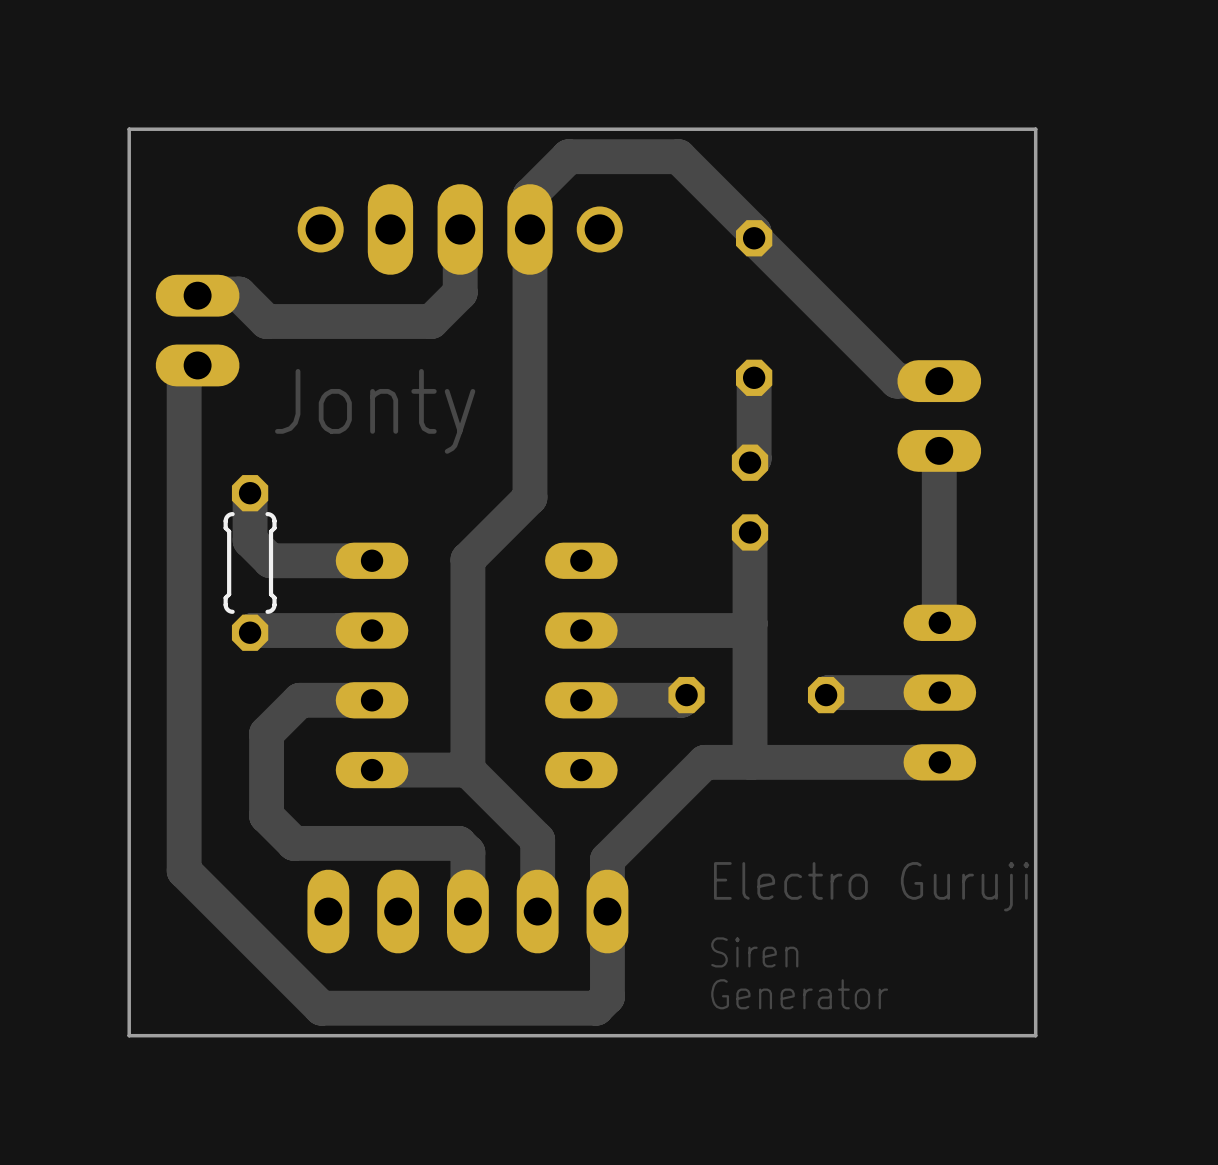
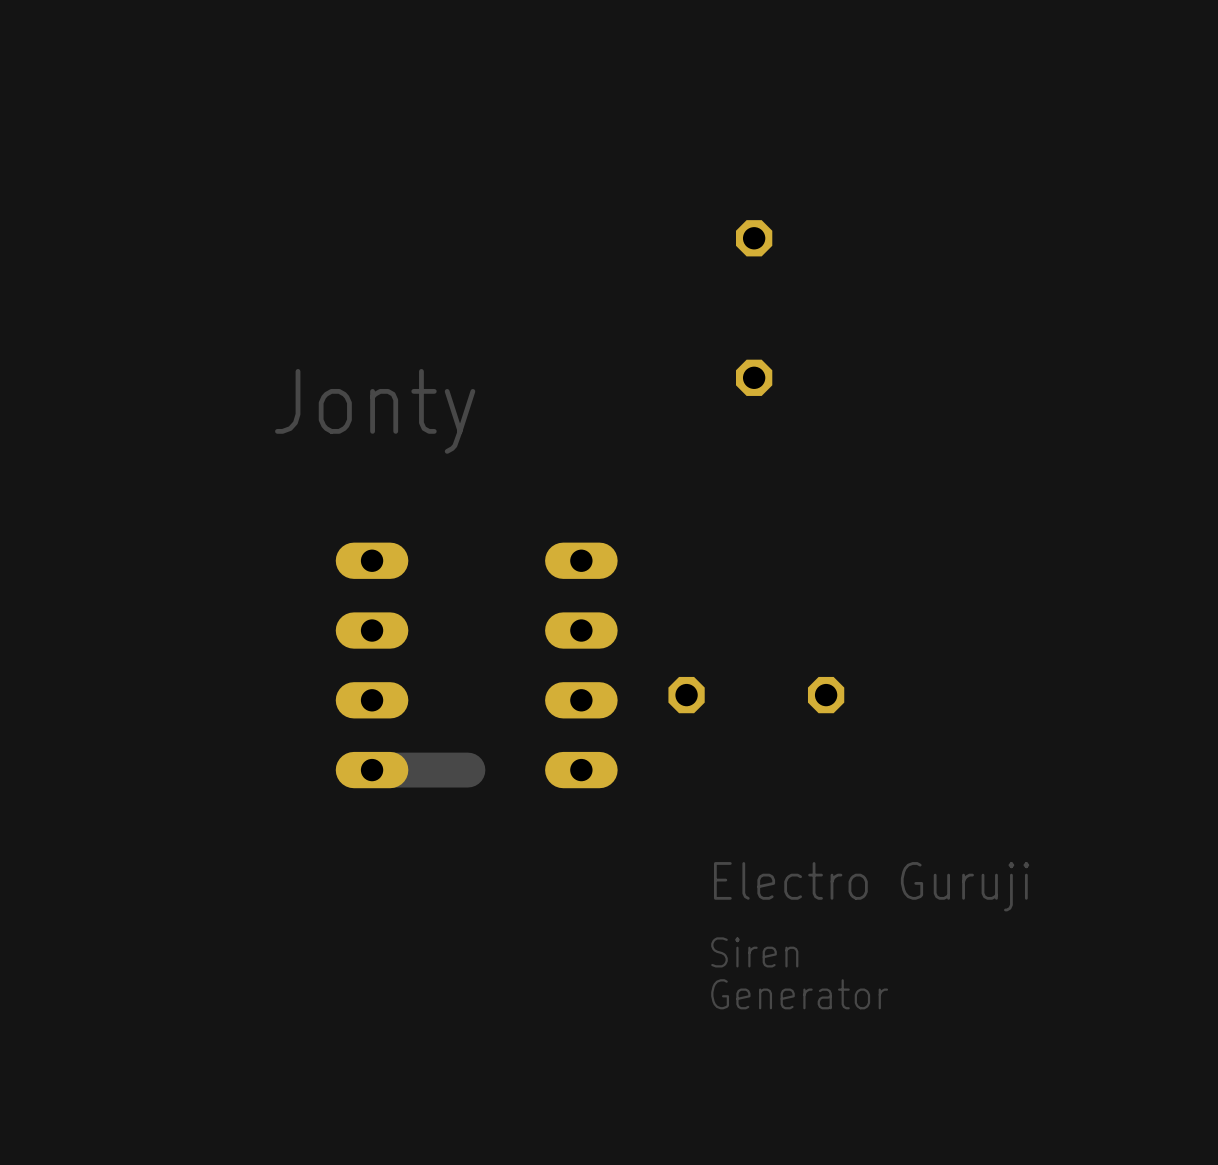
board edge: (1035, 129) (129, 129) (129, 1035) (1035, 1035) (1035, 129) -> none
track: (460, 229) (460, 292) (431, 321) (266, 321) (239, 294) (199, 294) (197, 295) -> none
part: (460, 229) -> none
part: (197, 330) -> none
track: (197, 365) (184, 378) (184, 870) (321, 1008) (596, 1008) (607, 996) (607, 859) (704, 762) (939, 762) -> none
track: (754, 377) (754, 458) (750, 462) -> none
track: (939, 381) (896, 381) (754, 238) (754, 232) (678, 156) (568, 156) (529, 195) (529, 497) (467, 559) (467, 770) (537, 839) (537, 911) -> none
part: (939, 415) -> none
track: (939, 450) (939, 622) -> none
track: (250, 493) (250, 540) (270, 560) (372, 560) -> none
part: (750, 497) -> none
track: (750, 532) (751, 762) -> none
part: (250, 562) -> none
track: (750, 623) (743, 630) (581, 630) -> none
track: (372, 630) (252, 630) (250, 632) -> none
track: (939, 692) (828, 692) (826, 695) -> none
part: (939, 692) -> none
track: (686, 695) (681, 700) (581, 700) -> none
track: (372, 700) (299, 700) (266, 733) (266, 815) (294, 843) (458, 843) (467, 852) (467, 911) -> none
part: (467, 911) -> none

